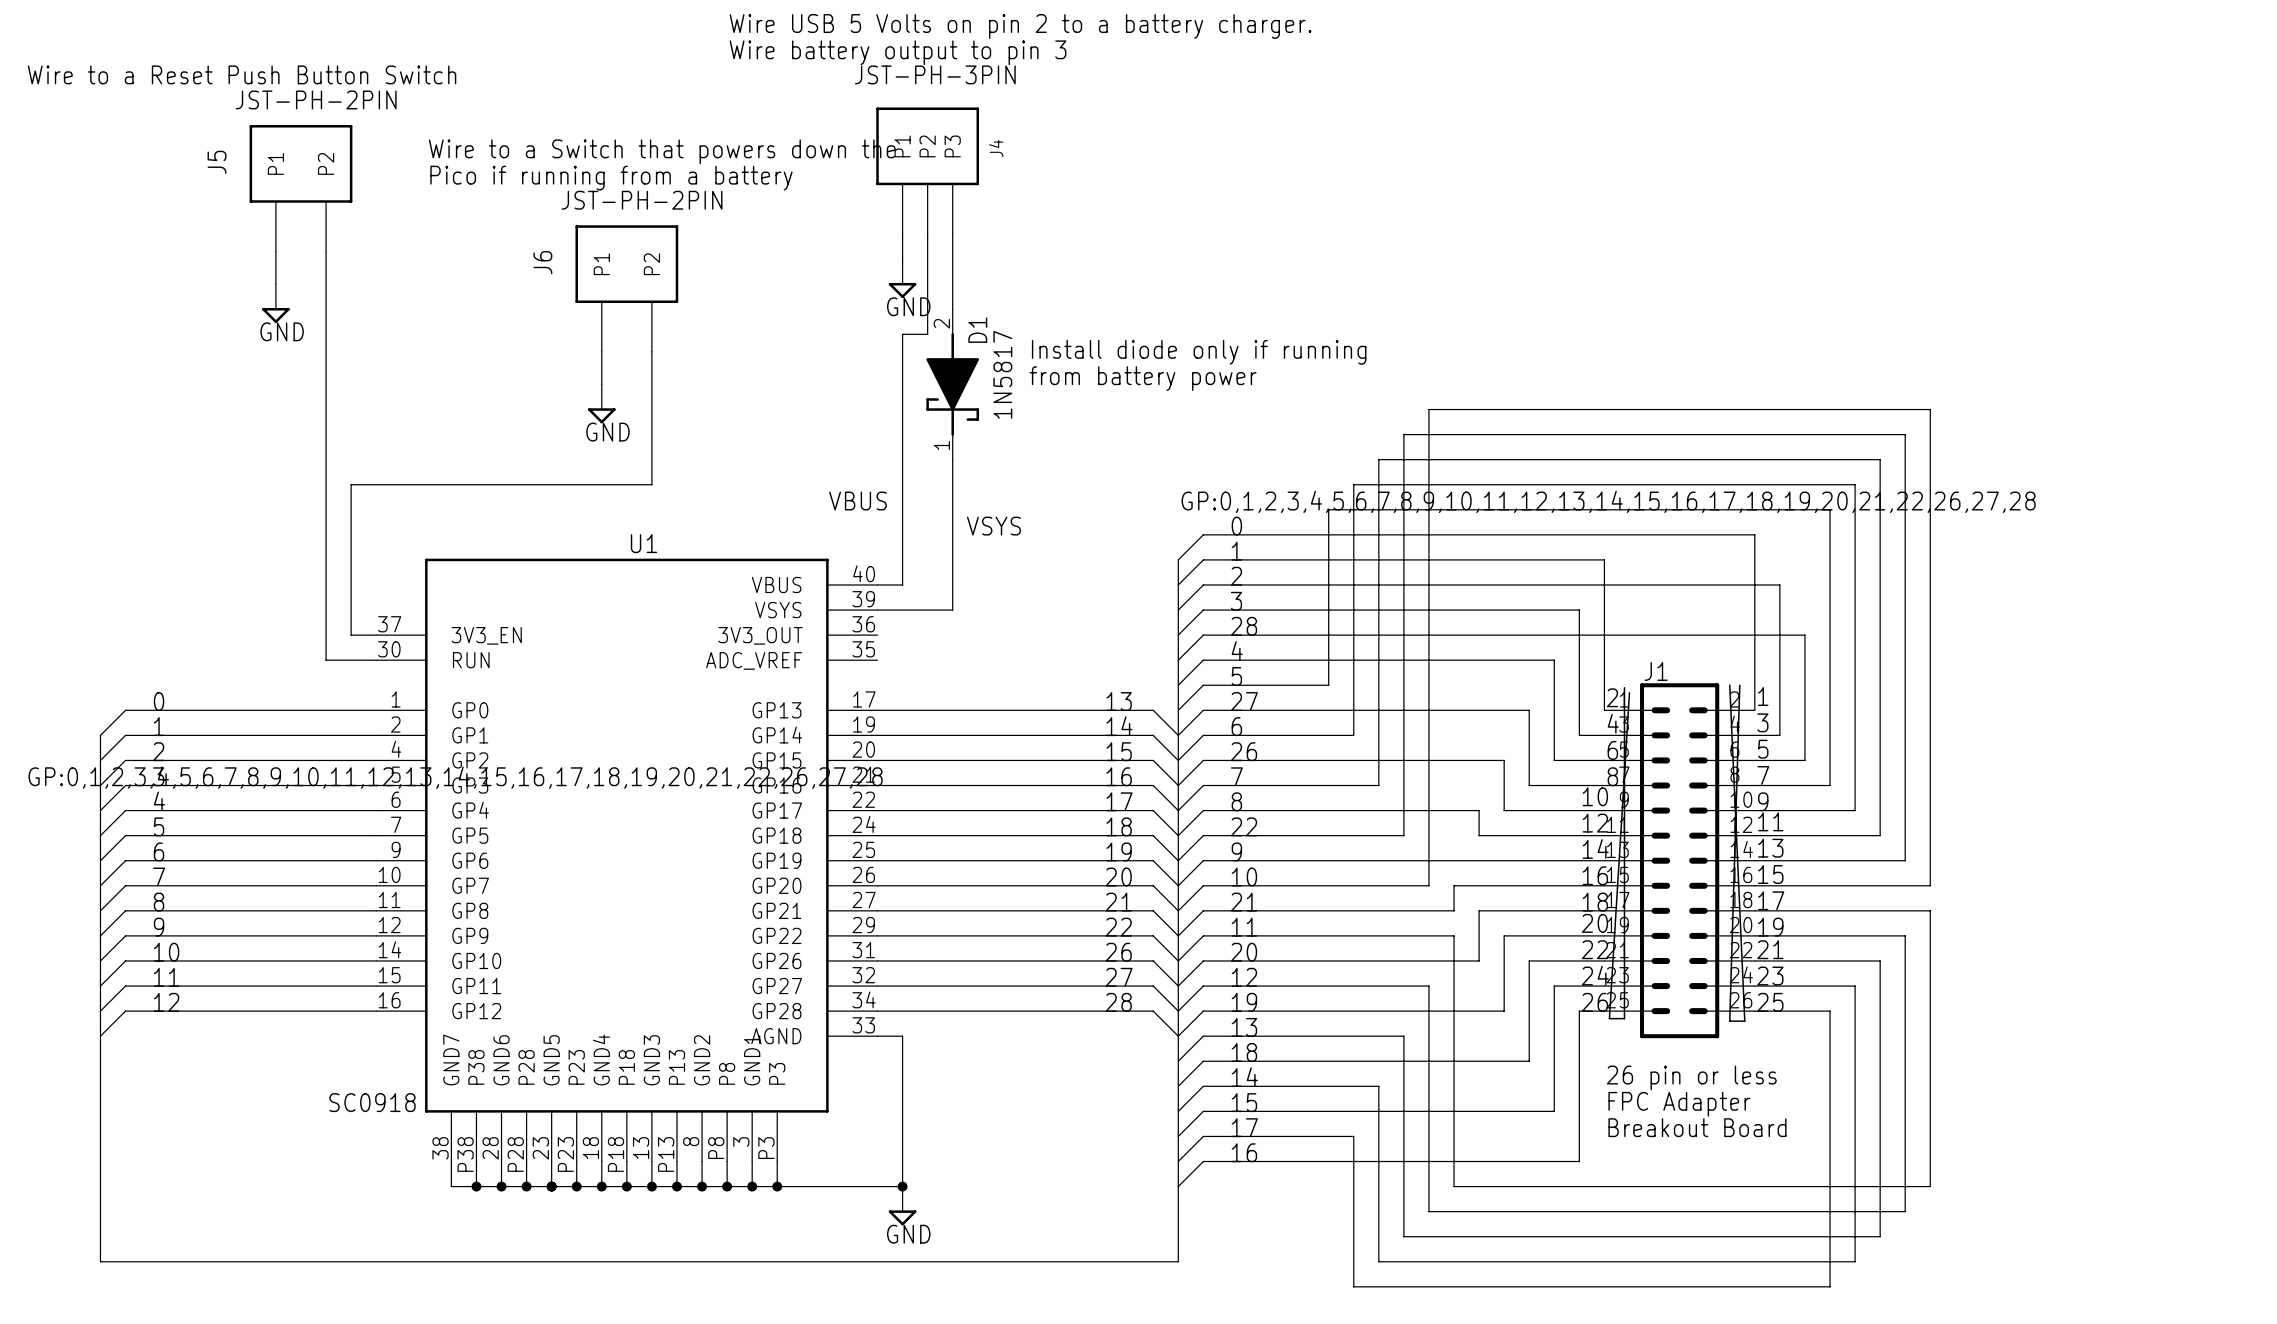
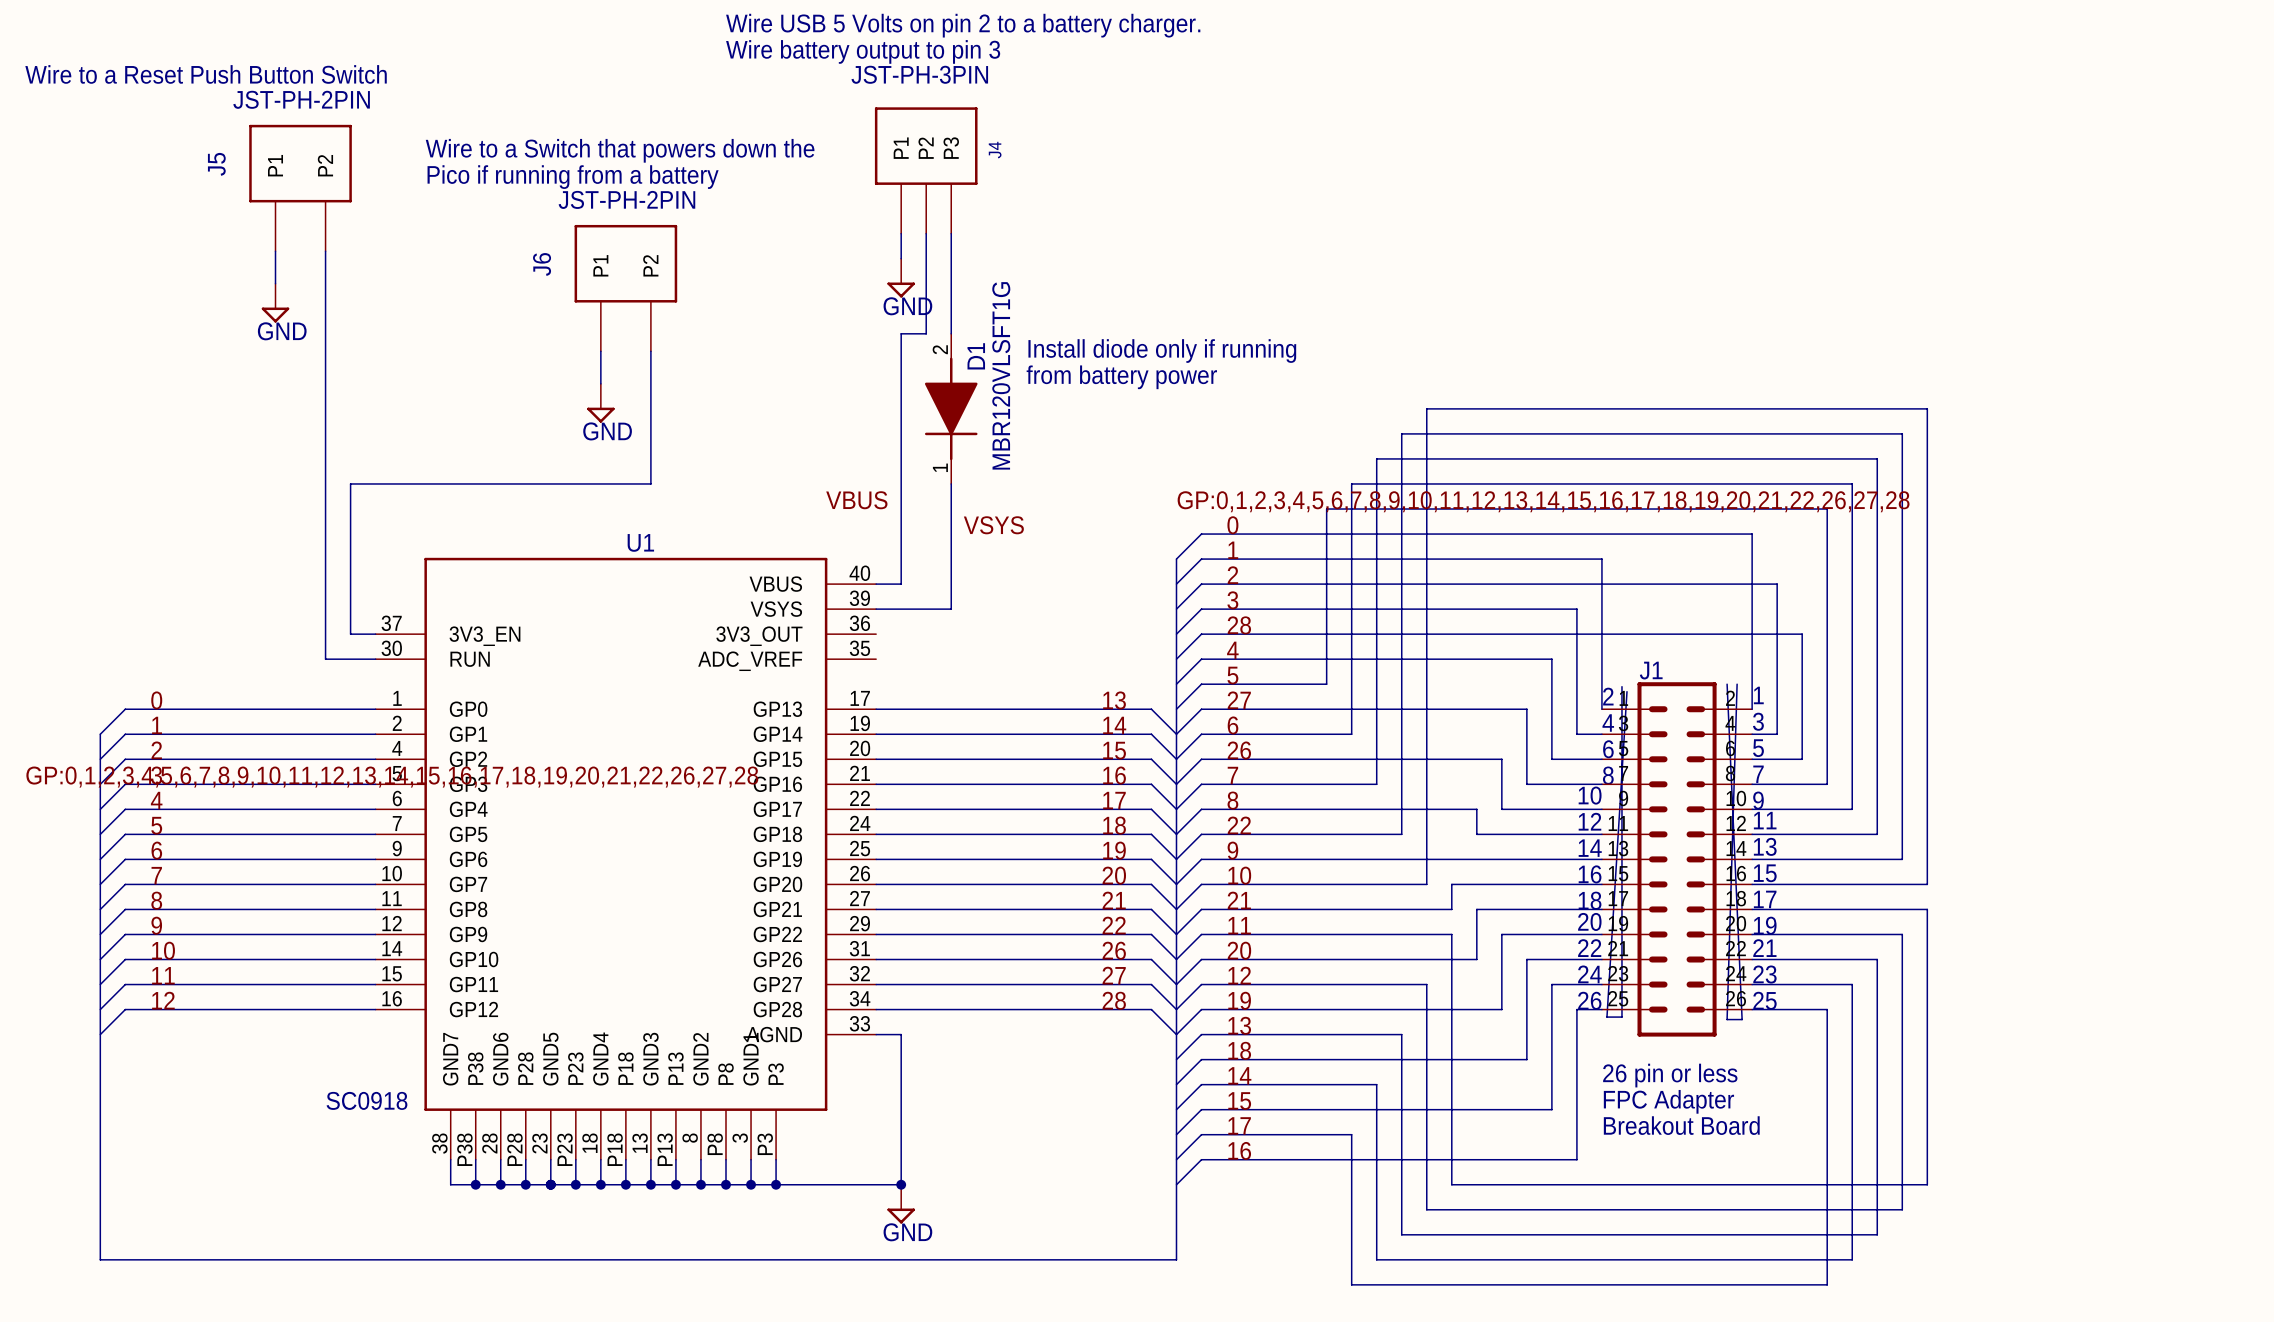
D1 symbol: [926, 309, 980, 460] -> [924, 333, 978, 484]
D1 value: 1N5817 (1002, 374) -> MBR120VLSFT1G (1001, 375)

